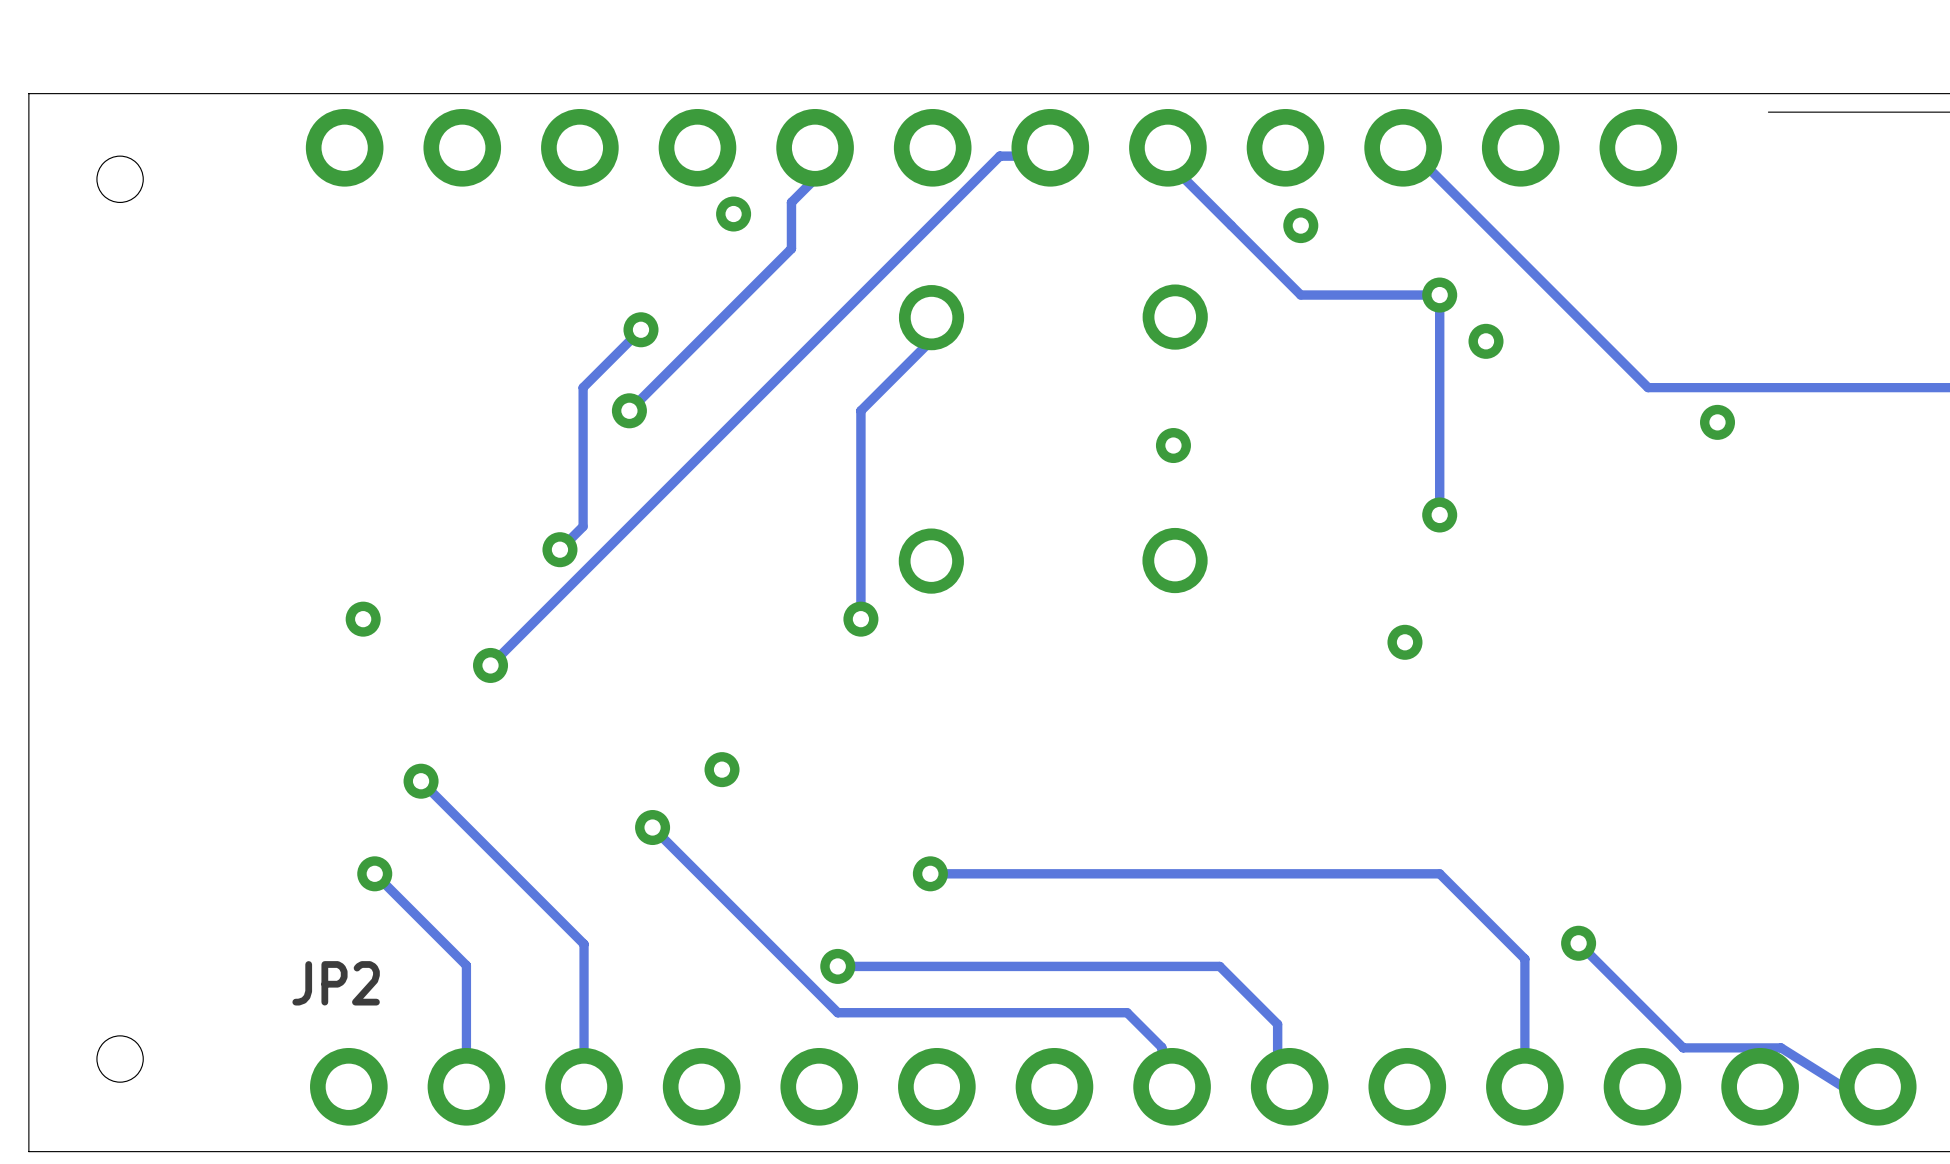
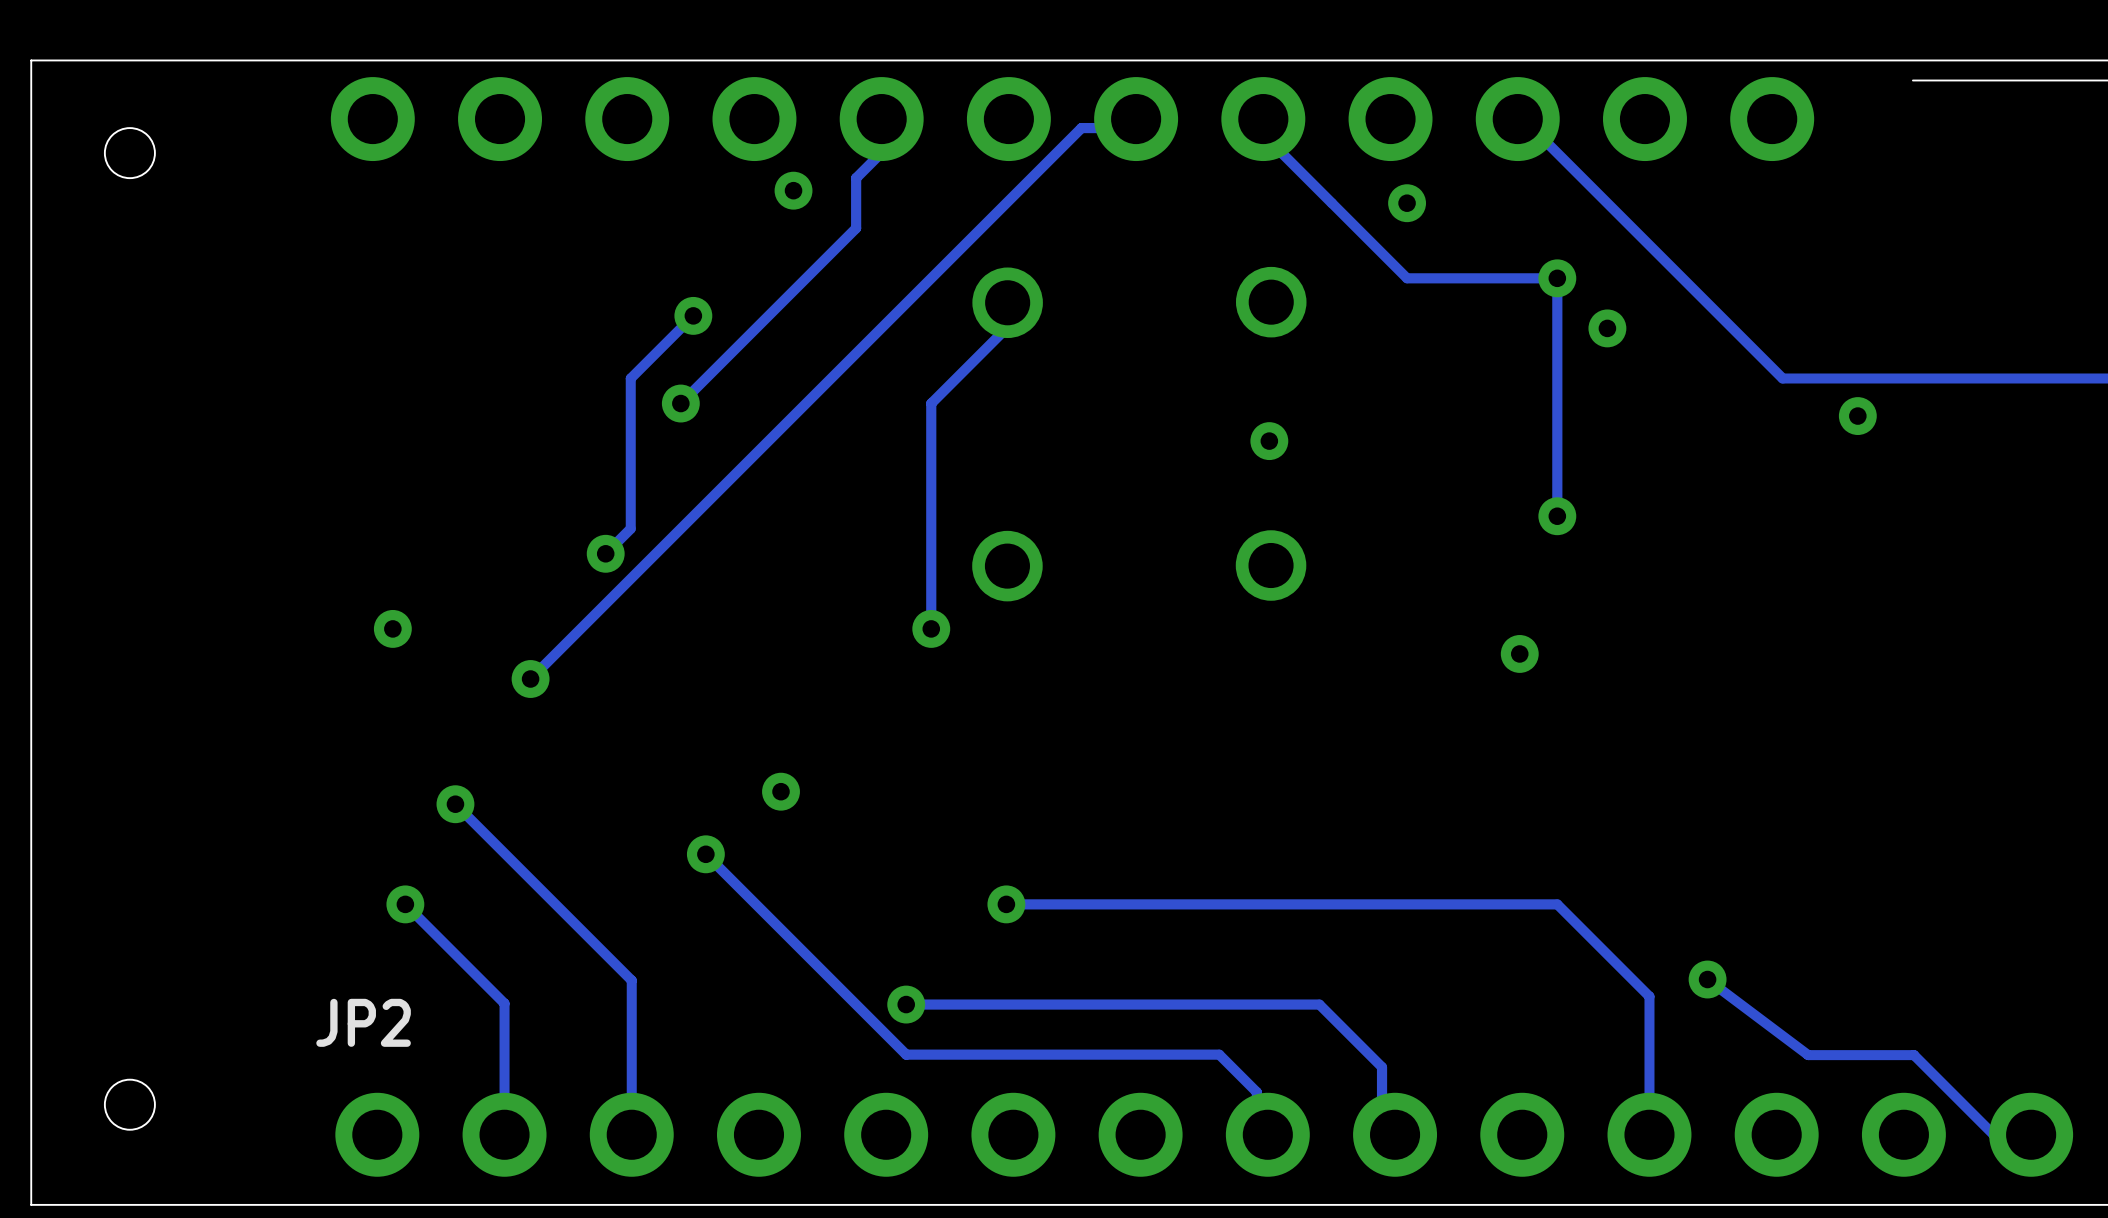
track: (1578, 943) (1683, 1047) (1781, 1047) (1843, 1086) -> (1707, 979) (1808, 1055) (1914, 1055) (1993, 1134)

